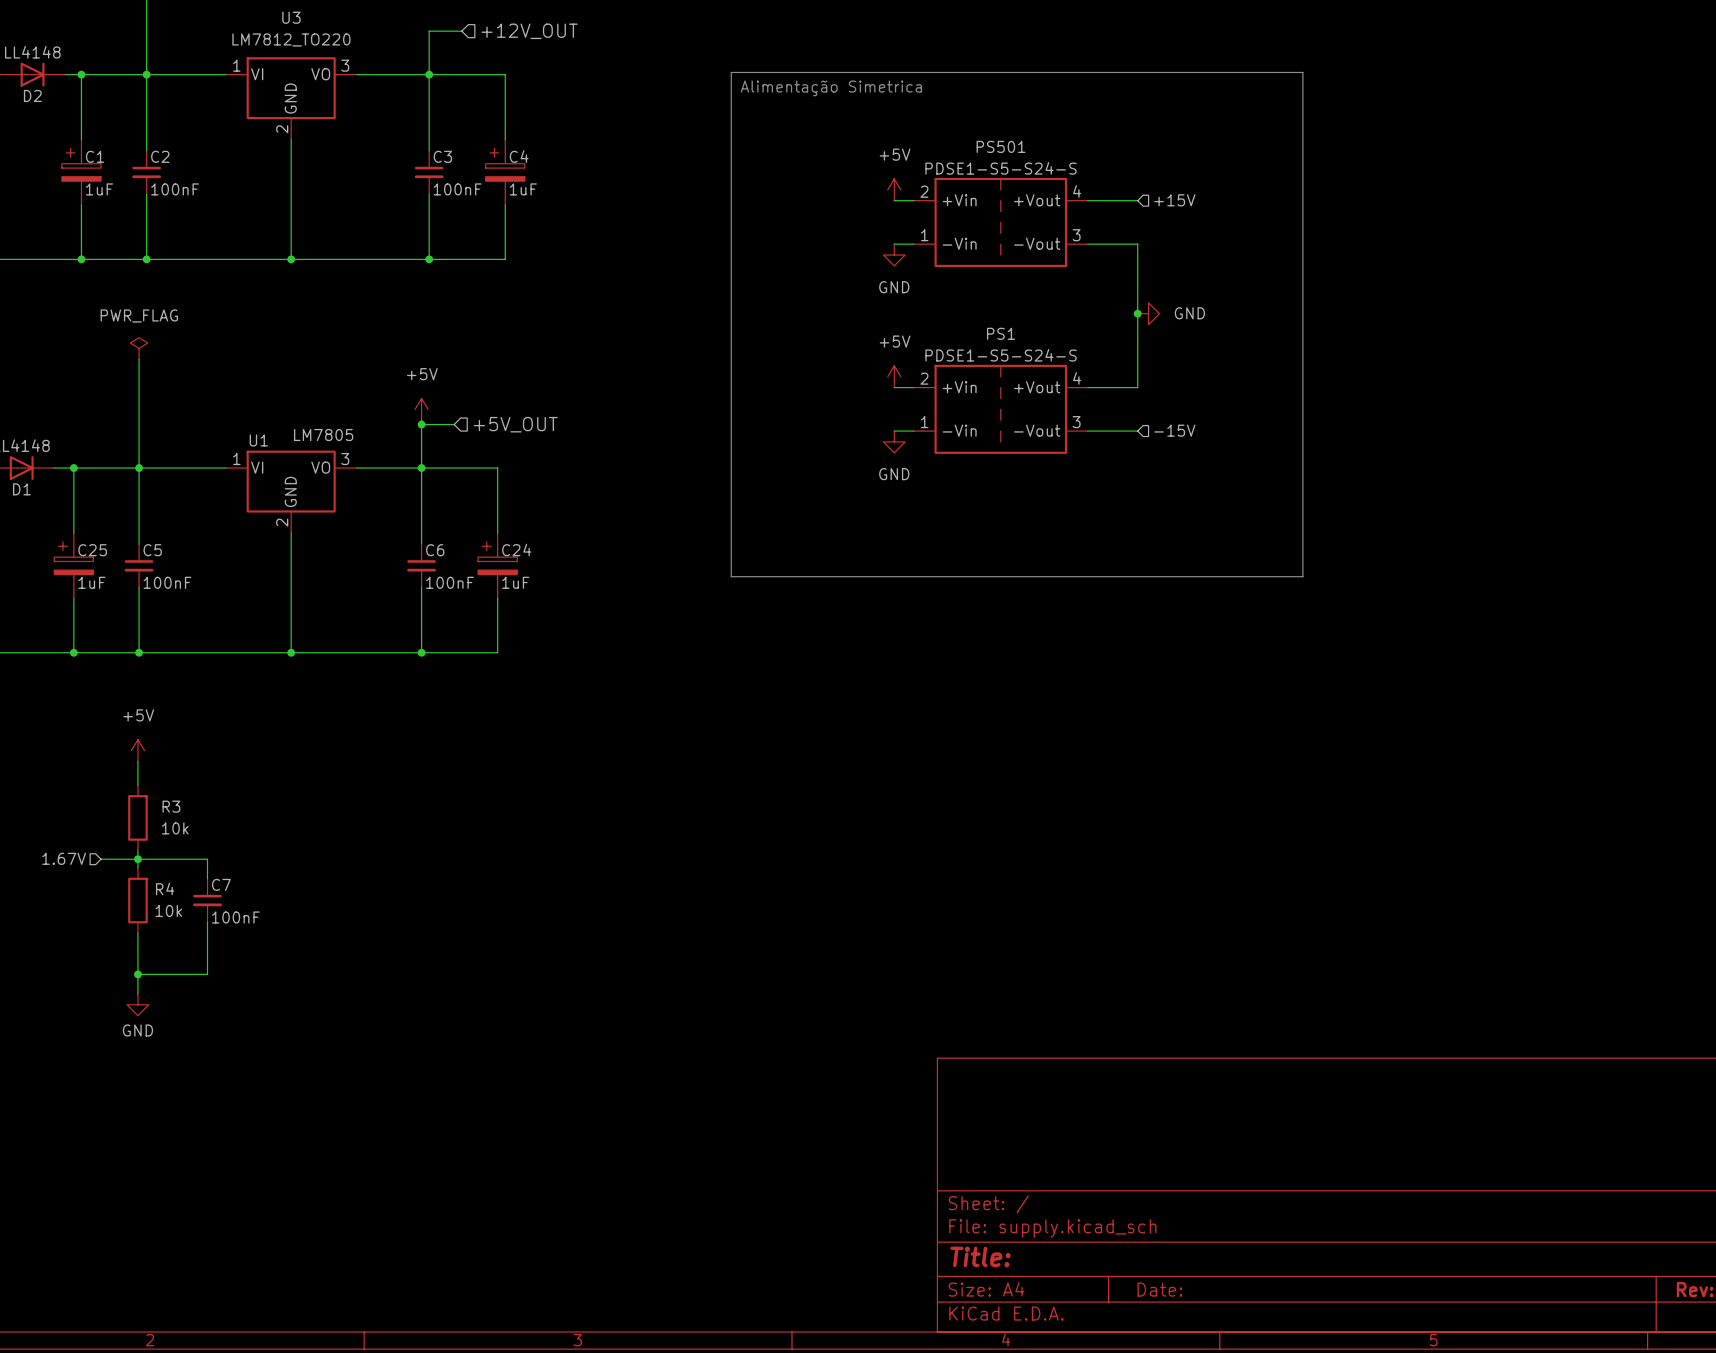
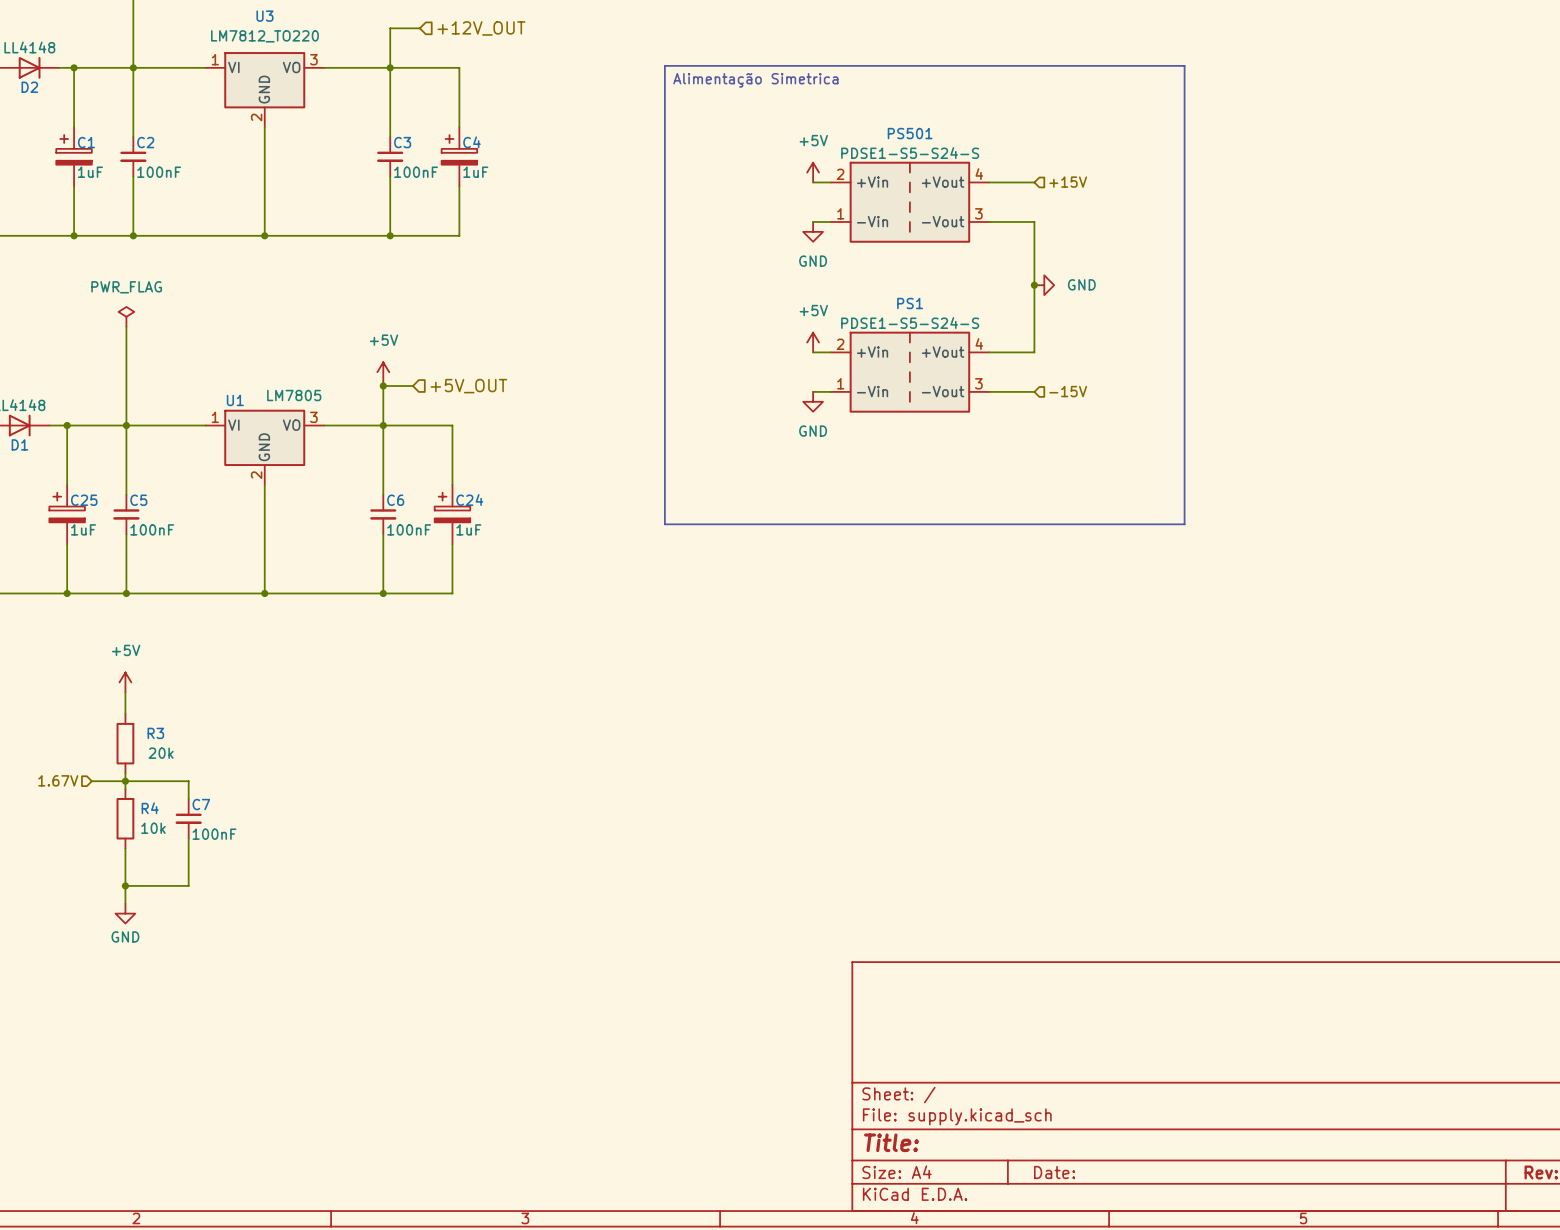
R3 value: 10k (175, 828) -> 20k (161, 753)

